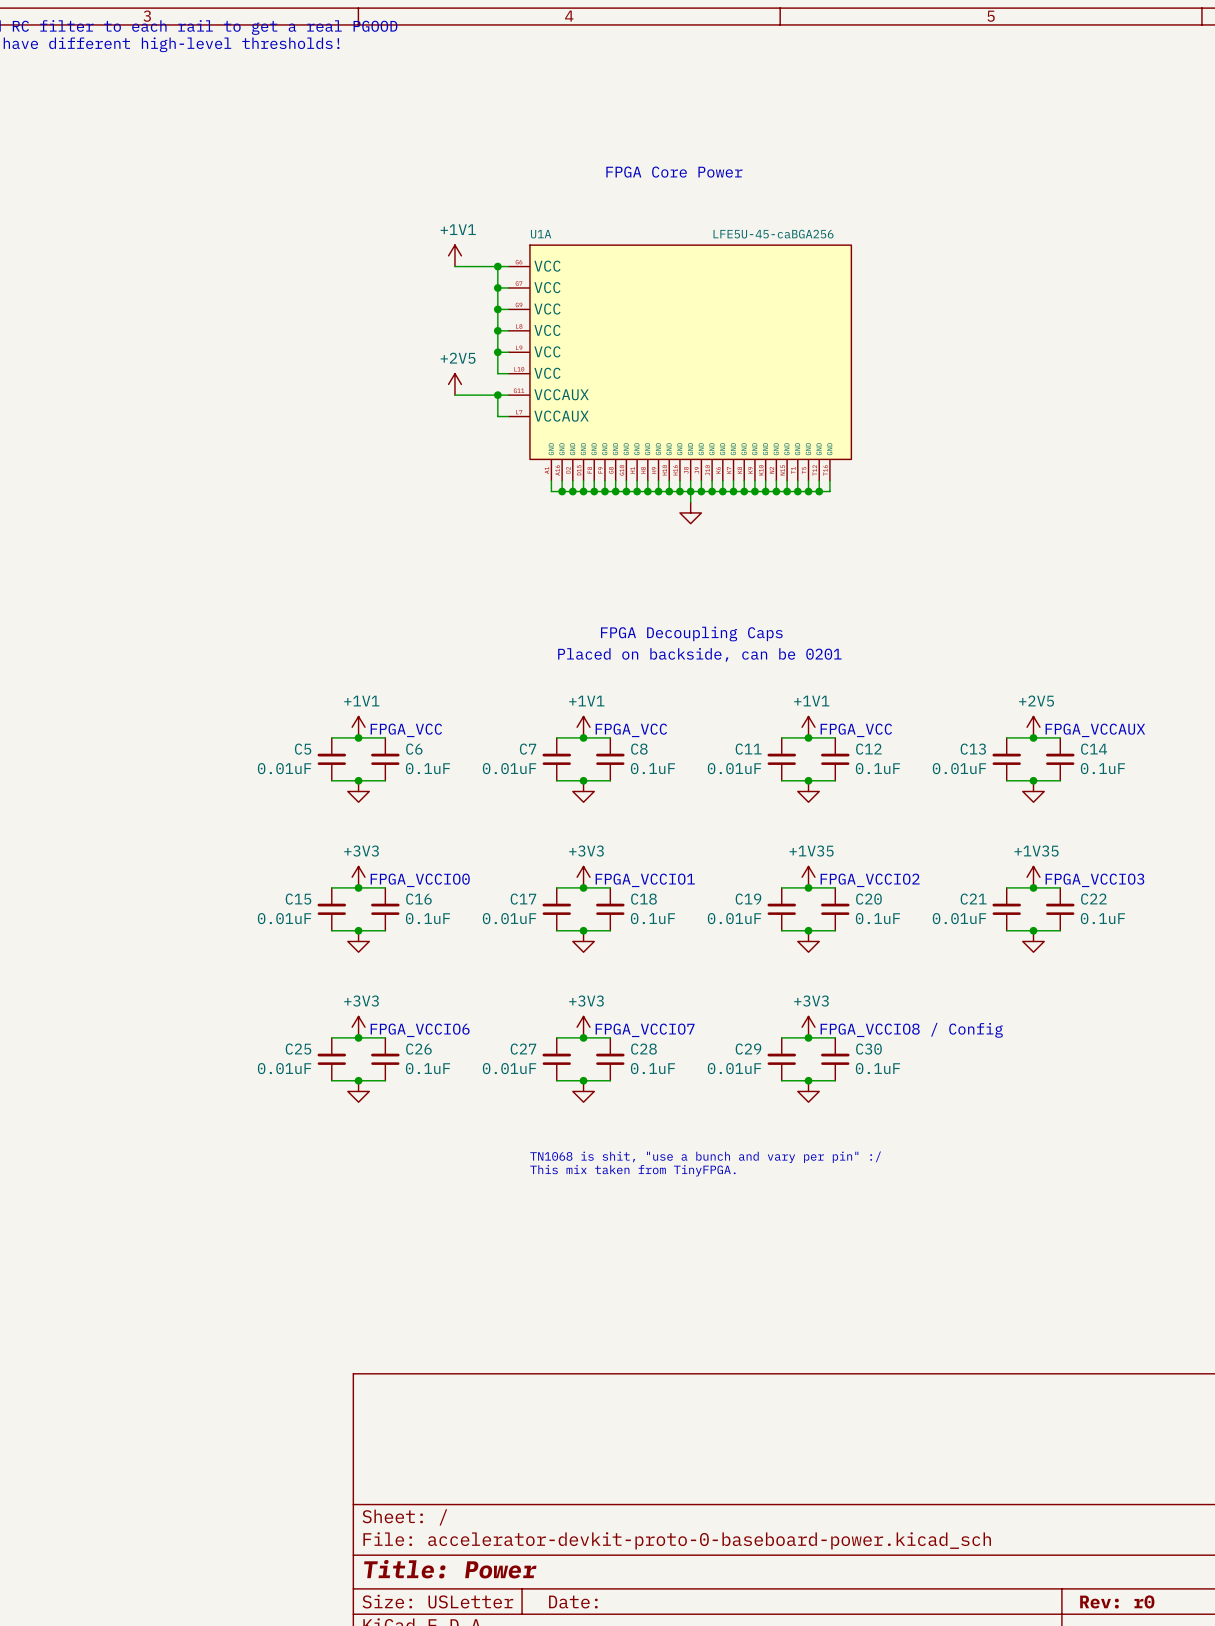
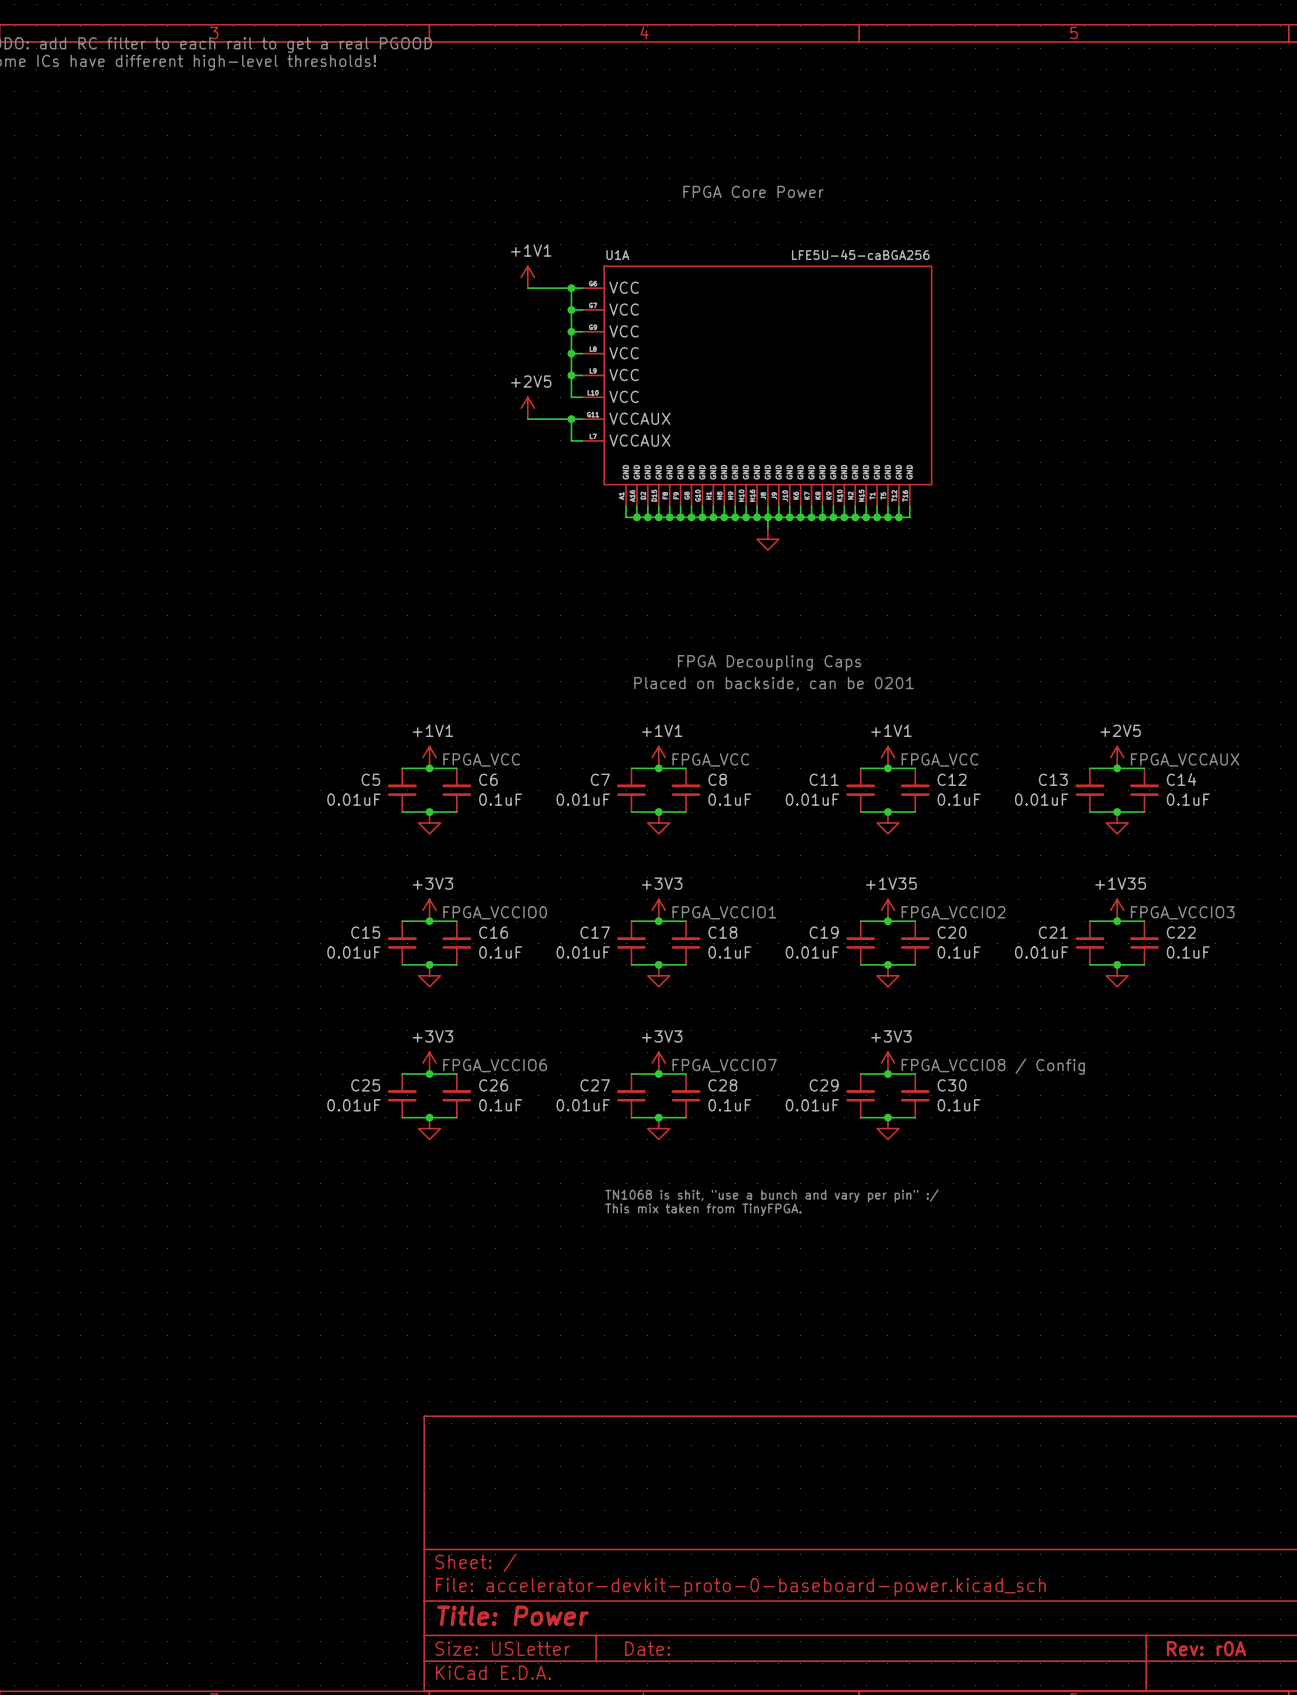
title block: Rev: r0 (1117, 1601) -> Rev: r0A (1206, 1648)

